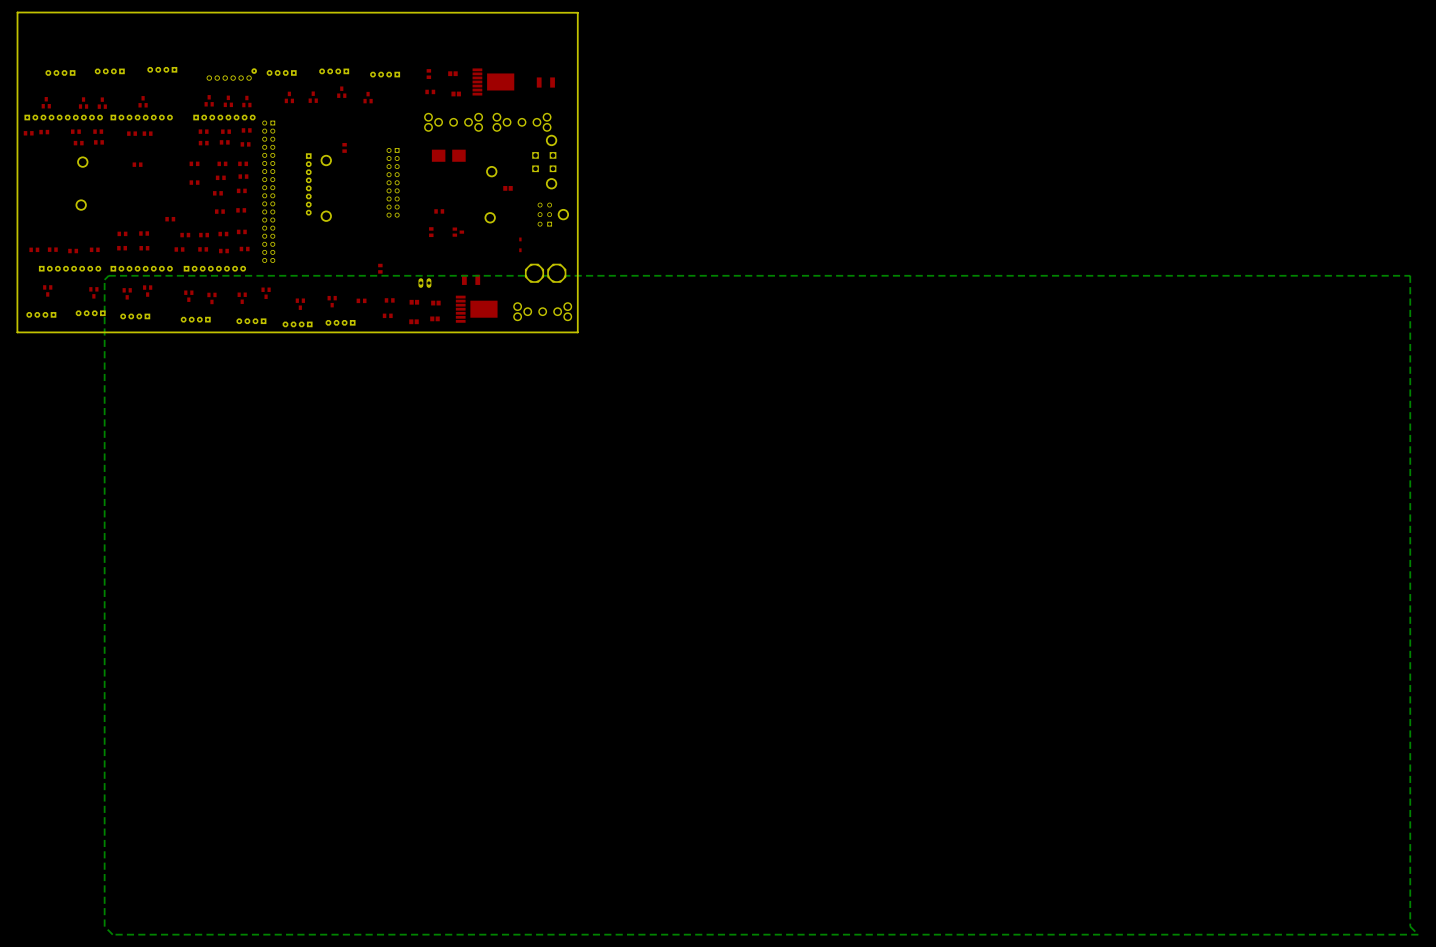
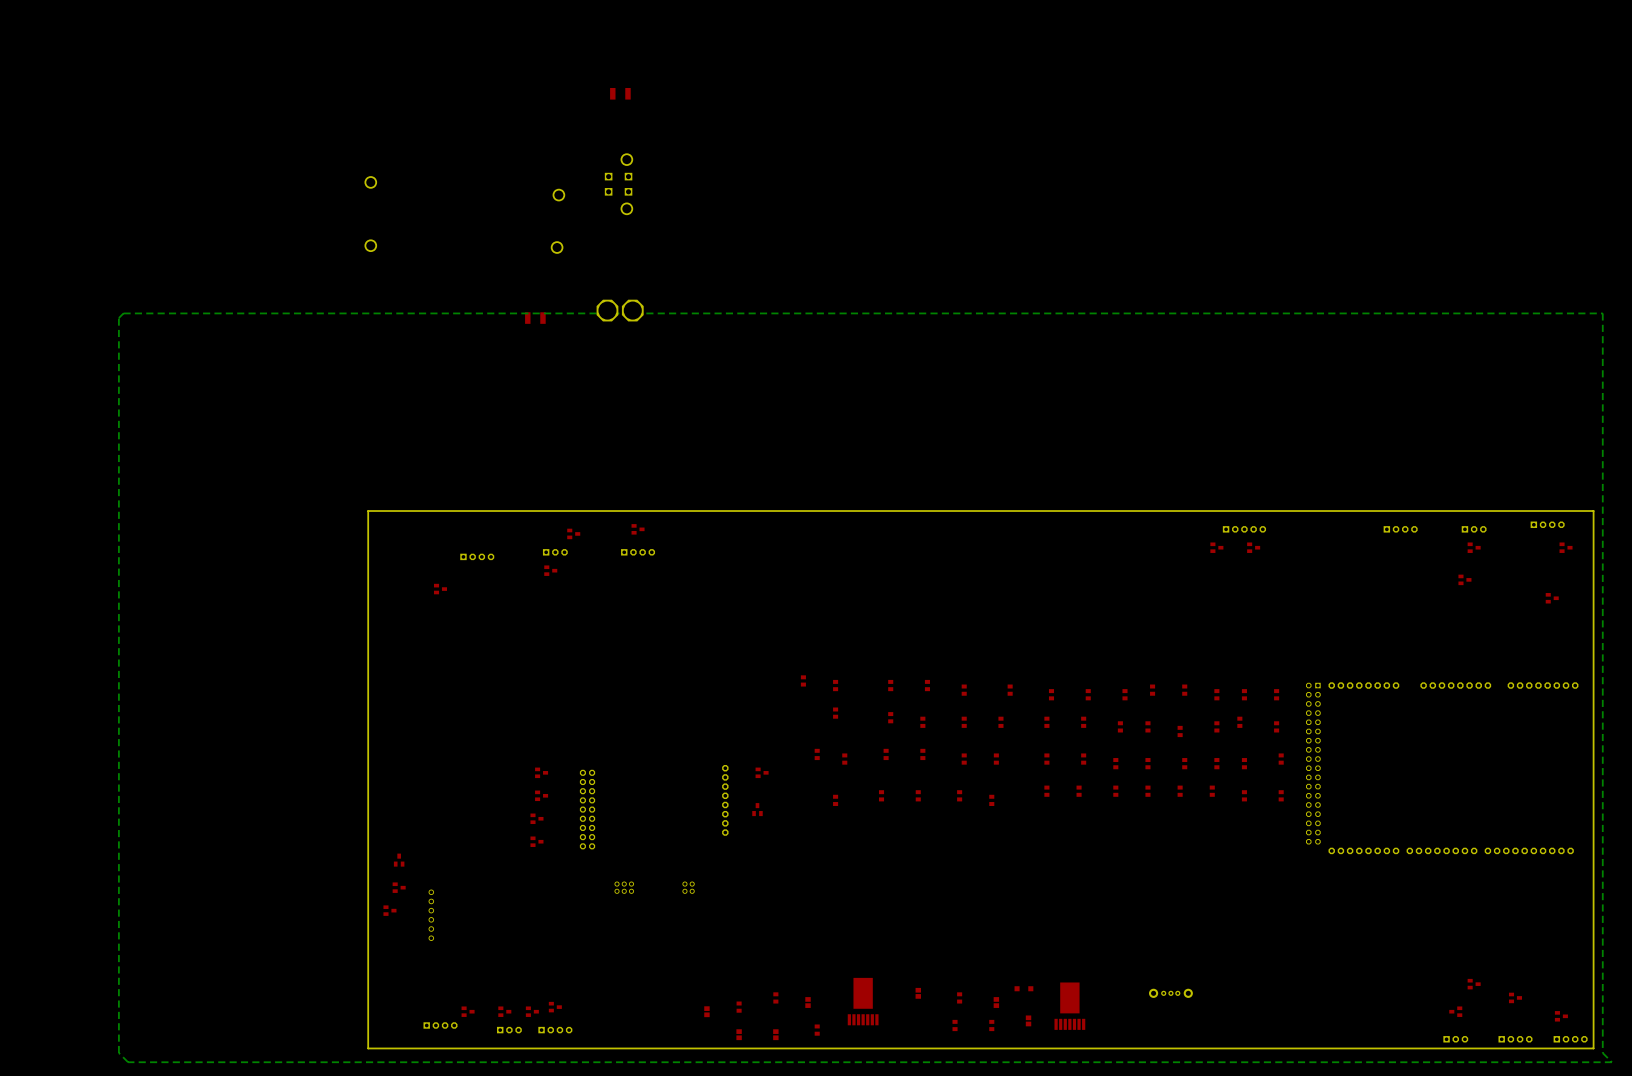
board edge: (17, 12) (577, 12) (577, 332) (17, 332) (17, 12) -> none
part: (162, 69) -> none
part: (109, 71) -> none
part: (334, 71) -> none
part: (60, 72) -> none
part: (281, 72) -> none
part: (452, 73) -> none
part: (231, 74) -> none
part: (385, 74) -> none
part: (428, 74) -> none
part: (493, 81) -> none
part: (430, 91) -> none
part: (341, 92) -> none
part: (456, 93) -> none
part: (289, 97) -> none
part: (313, 97) -> none
part: (368, 97) -> none
part: (209, 100) -> none
part: (143, 101) -> none
part: (228, 101) -> none
part: (246, 101) -> none
part: (46, 102) -> none
part: (83, 103) -> none
part: (102, 103) -> none
part: (63, 117) -> none
part: (141, 117) -> none
part: (224, 117) -> none
part: (453, 122) -> none
part: (522, 122) -> none
part: (246, 130) -> none
part: (75, 131) -> none
part: (98, 131) -> none
part: (203, 131) -> none
part: (226, 131) -> none
part: (44, 132) -> none
part: (28, 133) -> none
part: (132, 133) -> none
part: (147, 133) -> none
part: (98, 142) -> none
part: (224, 142) -> none
part: (78, 143) -> none
part: (203, 143) -> none
part: (245, 144) -> none
part: (344, 147) -> none
part: (448, 155) -> none
hole: (82, 162) -> none
part: (194, 163) -> none
part: (222, 163) -> none
part: (243, 163) -> none
part: (137, 164) -> none
part: (243, 176) -> none
part: (220, 177) -> none
part: (194, 182) -> none
part: (393, 182) -> none
part: (308, 184) -> none
part: (507, 188) -> none
part: (241, 190) -> none
part: (268, 191) -> none
part: (217, 193) -> none
hole: (81, 205) -> none
part: (241, 210) -> none
part: (219, 211) -> none
part: (439, 211) -> none
part: (552, 214) -> none
part: (170, 219) -> none
part: (241, 231) -> none
part: (431, 232) -> none
part: (458, 232) -> none
part: (122, 233) -> none
part: (144, 233) -> none
part: (223, 234) -> none
part: (185, 235) -> none
part: (204, 235) -> none
part: (520, 244) -> none
part: (122, 248) -> none
part: (144, 248) -> none
part: (34, 249) -> none
part: (52, 249) -> none
part: (94, 249) -> none
part: (179, 249) -> none
part: (203, 249) -> none
part: (244, 249) -> none
part: (73, 251) -> none
part: (223, 251) -> none
part: (70, 268) -> none
part: (141, 268) -> none
part: (214, 268) -> none
part: (380, 268) -> none
part: (424, 283) -> none
part: (47, 290) -> none
part: (147, 291) -> none
part: (93, 292) -> none
part: (127, 293) -> none
part: (266, 293) -> none
part: (188, 296) -> none
part: (211, 298) -> none
part: (242, 298) -> none
part: (361, 300) -> none
part: (389, 300) -> none
part: (332, 301) -> none
part: (414, 302) -> none
part: (435, 303) -> none
part: (300, 304) -> none
part: (476, 309) -> none
part: (542, 311) -> none
part: (90, 313) -> none
part: (41, 314) -> none
part: (387, 315) -> none
part: (135, 316) -> none
part: (434, 318) -> none
part: (195, 319) -> none
part: (251, 321) -> none
part: (414, 321) -> none
part: (340, 322) -> none
part: (297, 324) -> none
board edge: none -> (1593, 511) (368, 511) (368, 1048) (1593, 1048) (1593, 511)
part: none -> (1547, 524)
part: none -> (638, 529)
part: none -> (1244, 529)
part: none -> (1400, 529)
part: none -> (1474, 529)
part: none -> (573, 533)
part: none -> (1216, 547)
part: none -> (1253, 547)
part: none -> (1474, 547)
part: none -> (1566, 547)
part: none -> (555, 552)
part: none -> (638, 552)
part: none -> (477, 556)
part: none -> (550, 570)
part: none -> (1464, 579)
part: none -> (440, 589)
part: none -> (1552, 598)
part: none -> (803, 680)
part: none -> (835, 685)
part: none -> (890, 685)
part: none -> (927, 685)
part: none -> (1363, 685)
part: none -> (1455, 685)
part: none -> (1543, 685)
part: none -> (964, 690)
part: none -> (1010, 690)
part: none -> (1152, 690)
part: none -> (1184, 690)
part: none -> (1051, 694)
part: none -> (1088, 694)
part: none -> (1125, 694)
part: none -> (1216, 694)
part: none -> (1244, 694)
part: none -> (1276, 694)
part: none -> (835, 713)
part: none -> (890, 717)
part: none -> (922, 722)
part: none -> (964, 722)
part: none -> (1000, 722)
part: none -> (1046, 722)
part: none -> (1083, 722)
part: none -> (1239, 722)
part: none -> (1120, 726)
part: none -> (1147, 726)
part: none -> (1216, 726)
part: none -> (1276, 726)
part: none -> (1180, 731)
part: none -> (817, 754)
part: none -> (886, 754)
part: none -> (922, 754)
part: none -> (844, 759)
part: none -> (964, 759)
part: none -> (996, 759)
part: none -> (1046, 759)
part: none -> (1083, 759)
part: none -> (1281, 759)
part: none -> (1115, 763)
part: none -> (1147, 763)
part: none -> (1184, 763)
part: none -> (1216, 763)
part: none -> (1244, 763)
part: none -> (1313, 763)
part: none -> (541, 772)
part: none -> (762, 772)
part: none -> (1046, 791)
part: none -> (1079, 791)
part: none -> (1115, 791)
part: none -> (1147, 791)
part: none -> (1180, 791)
part: none -> (1212, 791)
part: none -> (541, 795)
part: none -> (881, 795)
part: none -> (918, 795)
part: none -> (959, 795)
part: none -> (1244, 795)
part: none -> (1281, 795)
part: none -> (725, 800)
part: none -> (835, 800)
part: none -> (991, 800)
part: none -> (587, 809)
part: none -> (757, 809)
part: none -> (536, 818)
part: none -> (536, 841)
part: none -> (1363, 850)
part: none -> (1441, 850)
part: none -> (1529, 850)
part: none -> (399, 860)
part: none -> (399, 887)
part: none -> (624, 887)
part: none -> (688, 887)
part: none -> (389, 910)
part: none -> (431, 915)
part: none -> (1474, 984)
part: none -> (1023, 988)
part: none -> (918, 993)
part: none -> (1170, 993)
part: none -> (775, 997)
part: none -> (959, 997)
part: none -> (1515, 997)
part: none -> (863, 1001)
part: none -> (808, 1002)
part: none -> (996, 1002)
part: none -> (1069, 1006)
part: none -> (555, 1007)
part: none -> (739, 1007)
part: none -> (468, 1011)
part: none -> (504, 1011)
part: none -> (532, 1011)
part: none -> (706, 1011)
part: none -> (1455, 1011)
part: none -> (1561, 1016)
part: none -> (1028, 1020)
part: none -> (440, 1025)
part: none -> (955, 1025)
part: none -> (991, 1025)
part: none -> (509, 1030)
part: none -> (555, 1030)
part: none -> (817, 1030)
part: none -> (739, 1034)
part: none -> (775, 1034)
part: none -> (1455, 1039)
part: none -> (1515, 1039)
part: none -> (1570, 1039)

